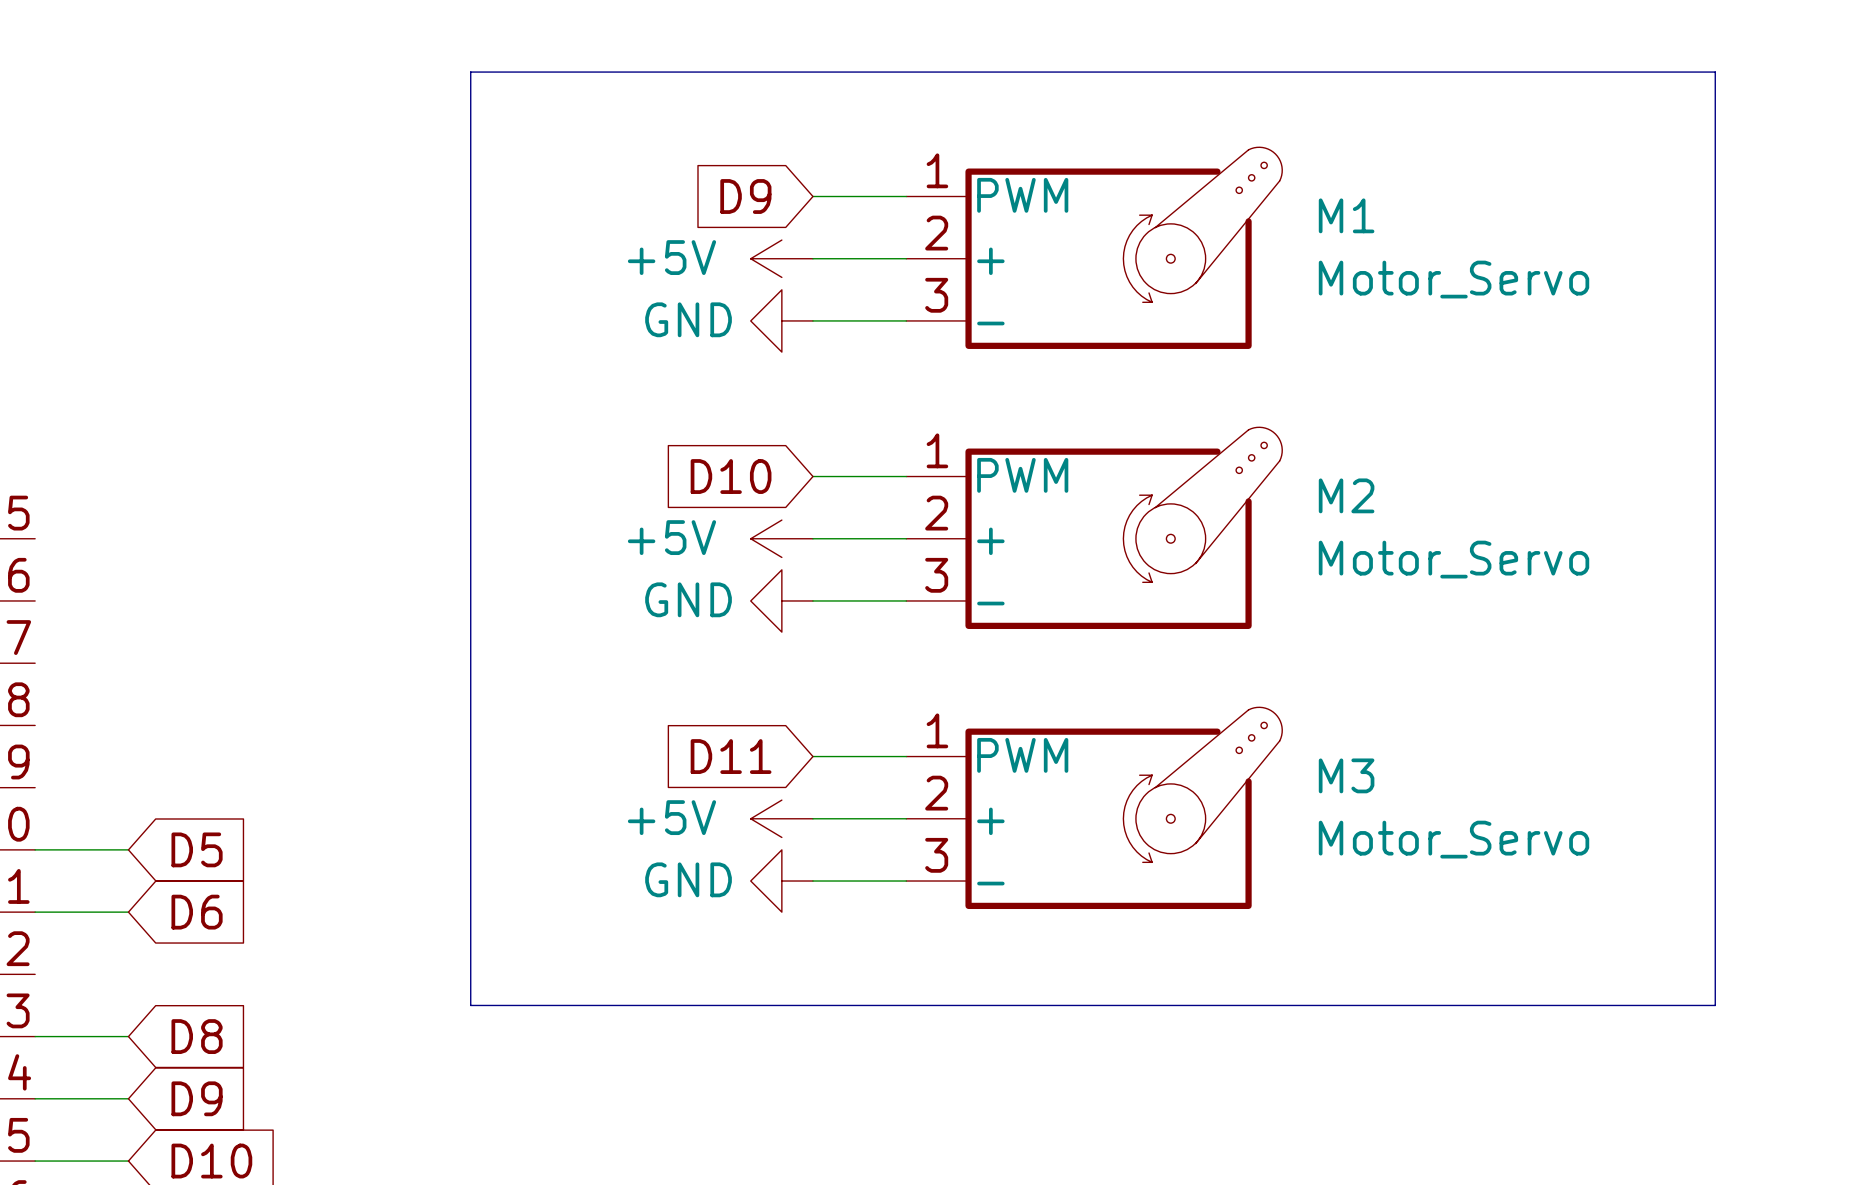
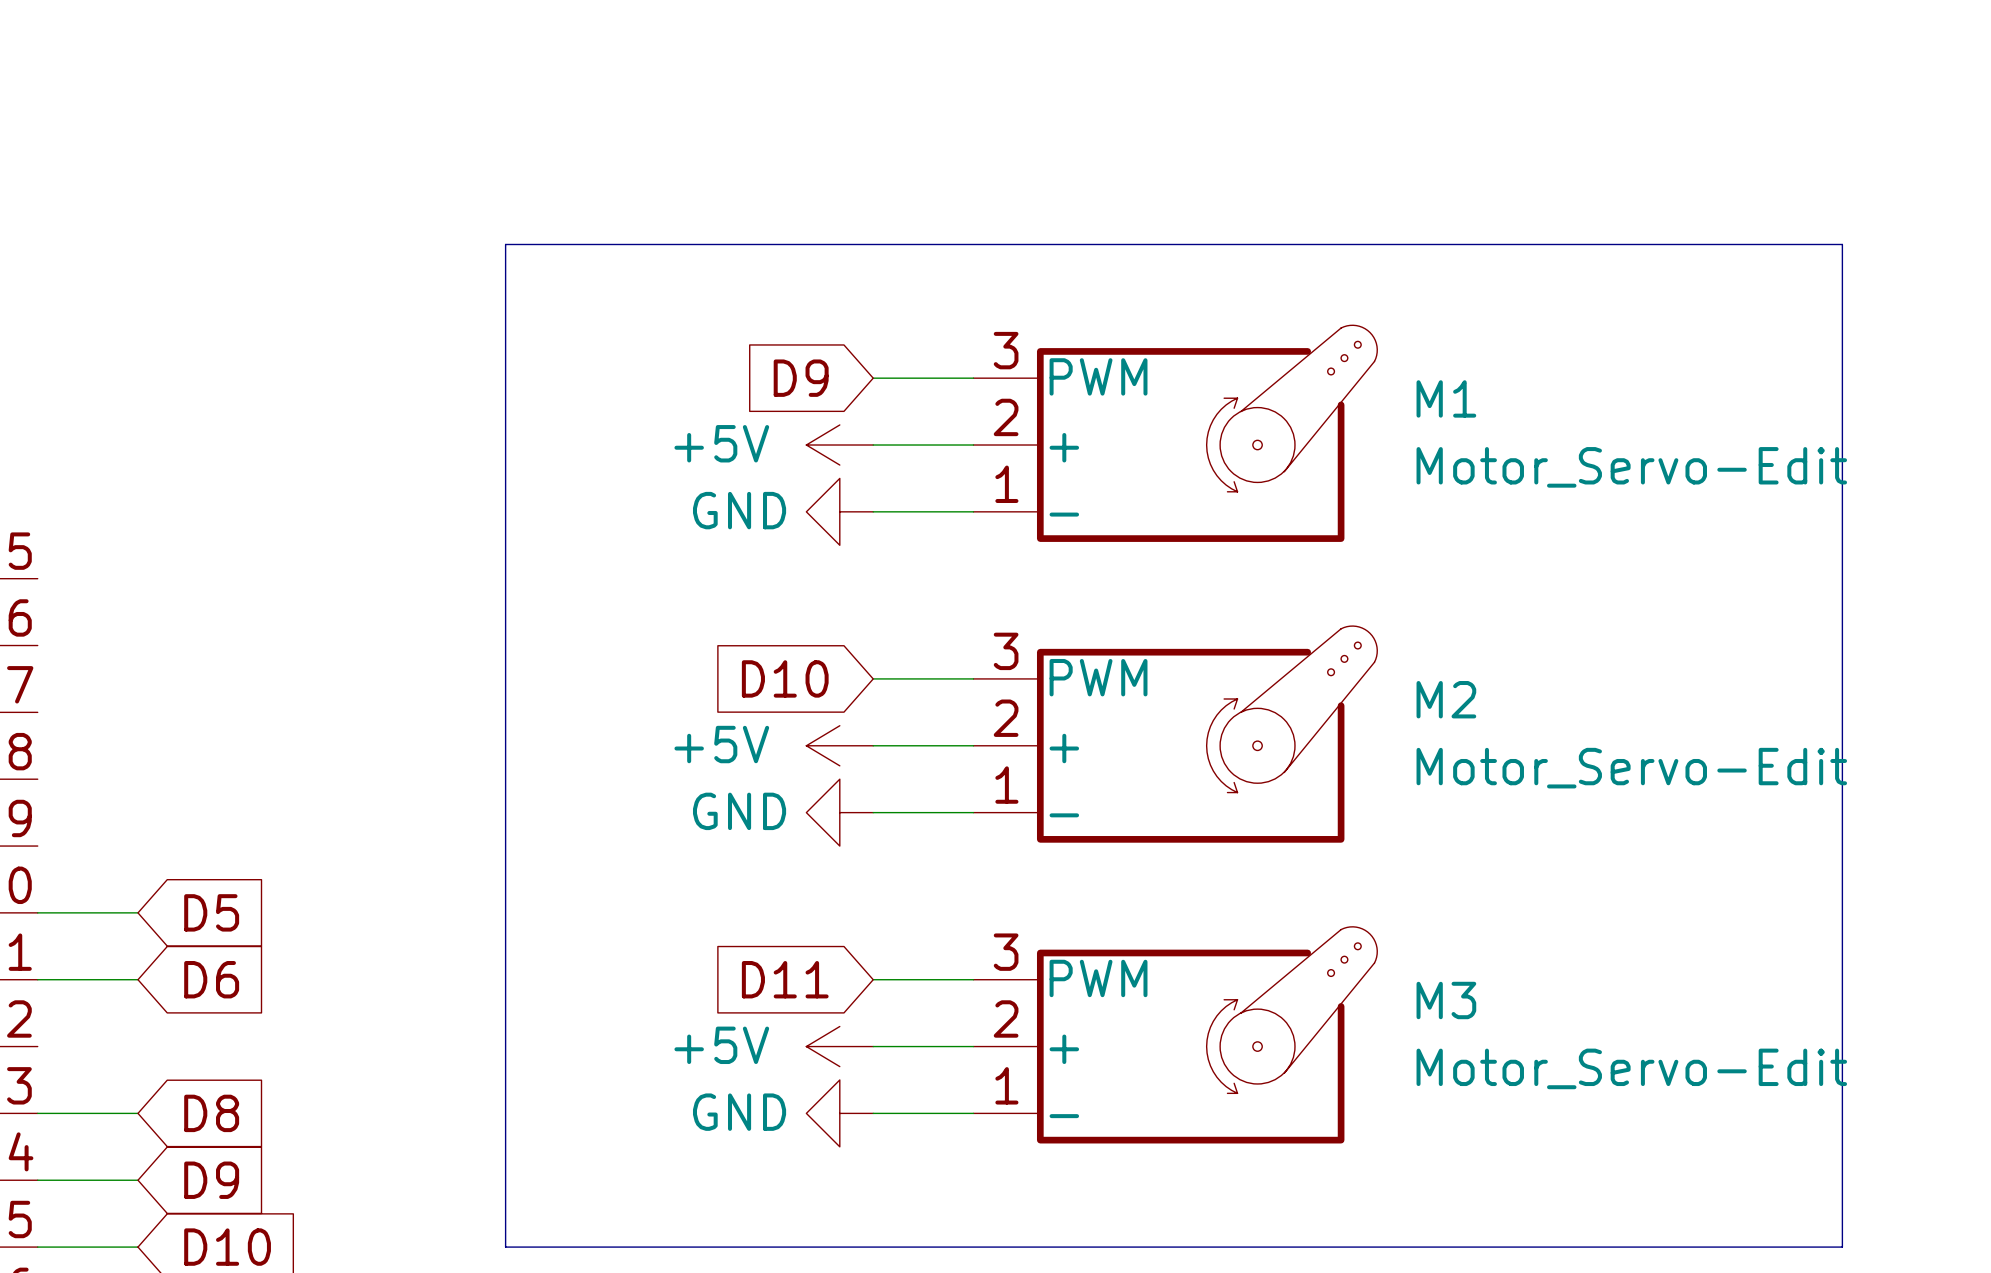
M1 pin number: 1 (937, 170) -> 3 (1006, 350)
global label position: D9 (745, 196) -> D9 (801, 378)
wire: (812, 196) (906, 196) -> none
line: (470, 227) (470, 72) (1715, 72) (1715, 227) -> (505, 244) (1842, 244)
M1 position: (1094, 248) -> (1175, 433)
power symbol: +5V (781, 258) -> none
wire: (812, 258) (906, 258) -> (873, 378) (973, 378)
M1 value: Motor_Servo (1454, 279) -> Motor_Servo-Edit (1631, 467)
M1 pin number: 3 (936, 295) -> 1 (1006, 484)
power symbol: GND (781, 320) -> none
wire: (812, 320) (906, 320) -> (873, 445) (973, 445)
power symbol: none -> +5V (839, 445)
M2 pin number: 1 (937, 450) -> 3 (1006, 651)
global label position: D10 (731, 476) -> D10 (785, 678)
power symbol: none -> GND (839, 511)
M2 position: (1094, 528) -> (1175, 734)
power symbol: +5V (781, 538) -> none
wire: (812, 538) (906, 538) -> (873, 678) (973, 678)
M2 value: Motor_Servo (1454, 559) -> Motor_Servo-Edit (1631, 768)
M2 pin number: 3 (936, 575) -> 1 (1006, 785)
power symbol: GND (781, 600) -> none
wire: (812, 600) (906, 600) -> (873, 745) (973, 745)
power symbol: none -> +5V (839, 745)
M3 pin number: 1 (937, 730) -> 3 (1006, 952)
global label position: D11 (731, 756) -> D11 (785, 979)
power symbol: none -> GND (839, 812)
M3 position: (1094, 808) -> (1175, 1035)
power symbol: +5V (781, 818) -> none
wire: (812, 818) (906, 818) -> (873, 979) (973, 979)
M3 value: Motor_Servo (1454, 839) -> Motor_Servo-Edit (1631, 1068)
M3 pin number: 3 (936, 855) -> 1 (1006, 1085)
power symbol: GND (781, 881) -> none
wire: (812, 881) (906, 881) -> (873, 1046) (973, 1046)
power symbol: none -> +5V (839, 1046)
line: (470, 1005) (1715, 1005) -> (505, 1079) (505, 1247) (1842, 1247) (1842, 1079)
power symbol: none -> GND (839, 1113)
wire: none -> (873, 1113) (973, 1113)

